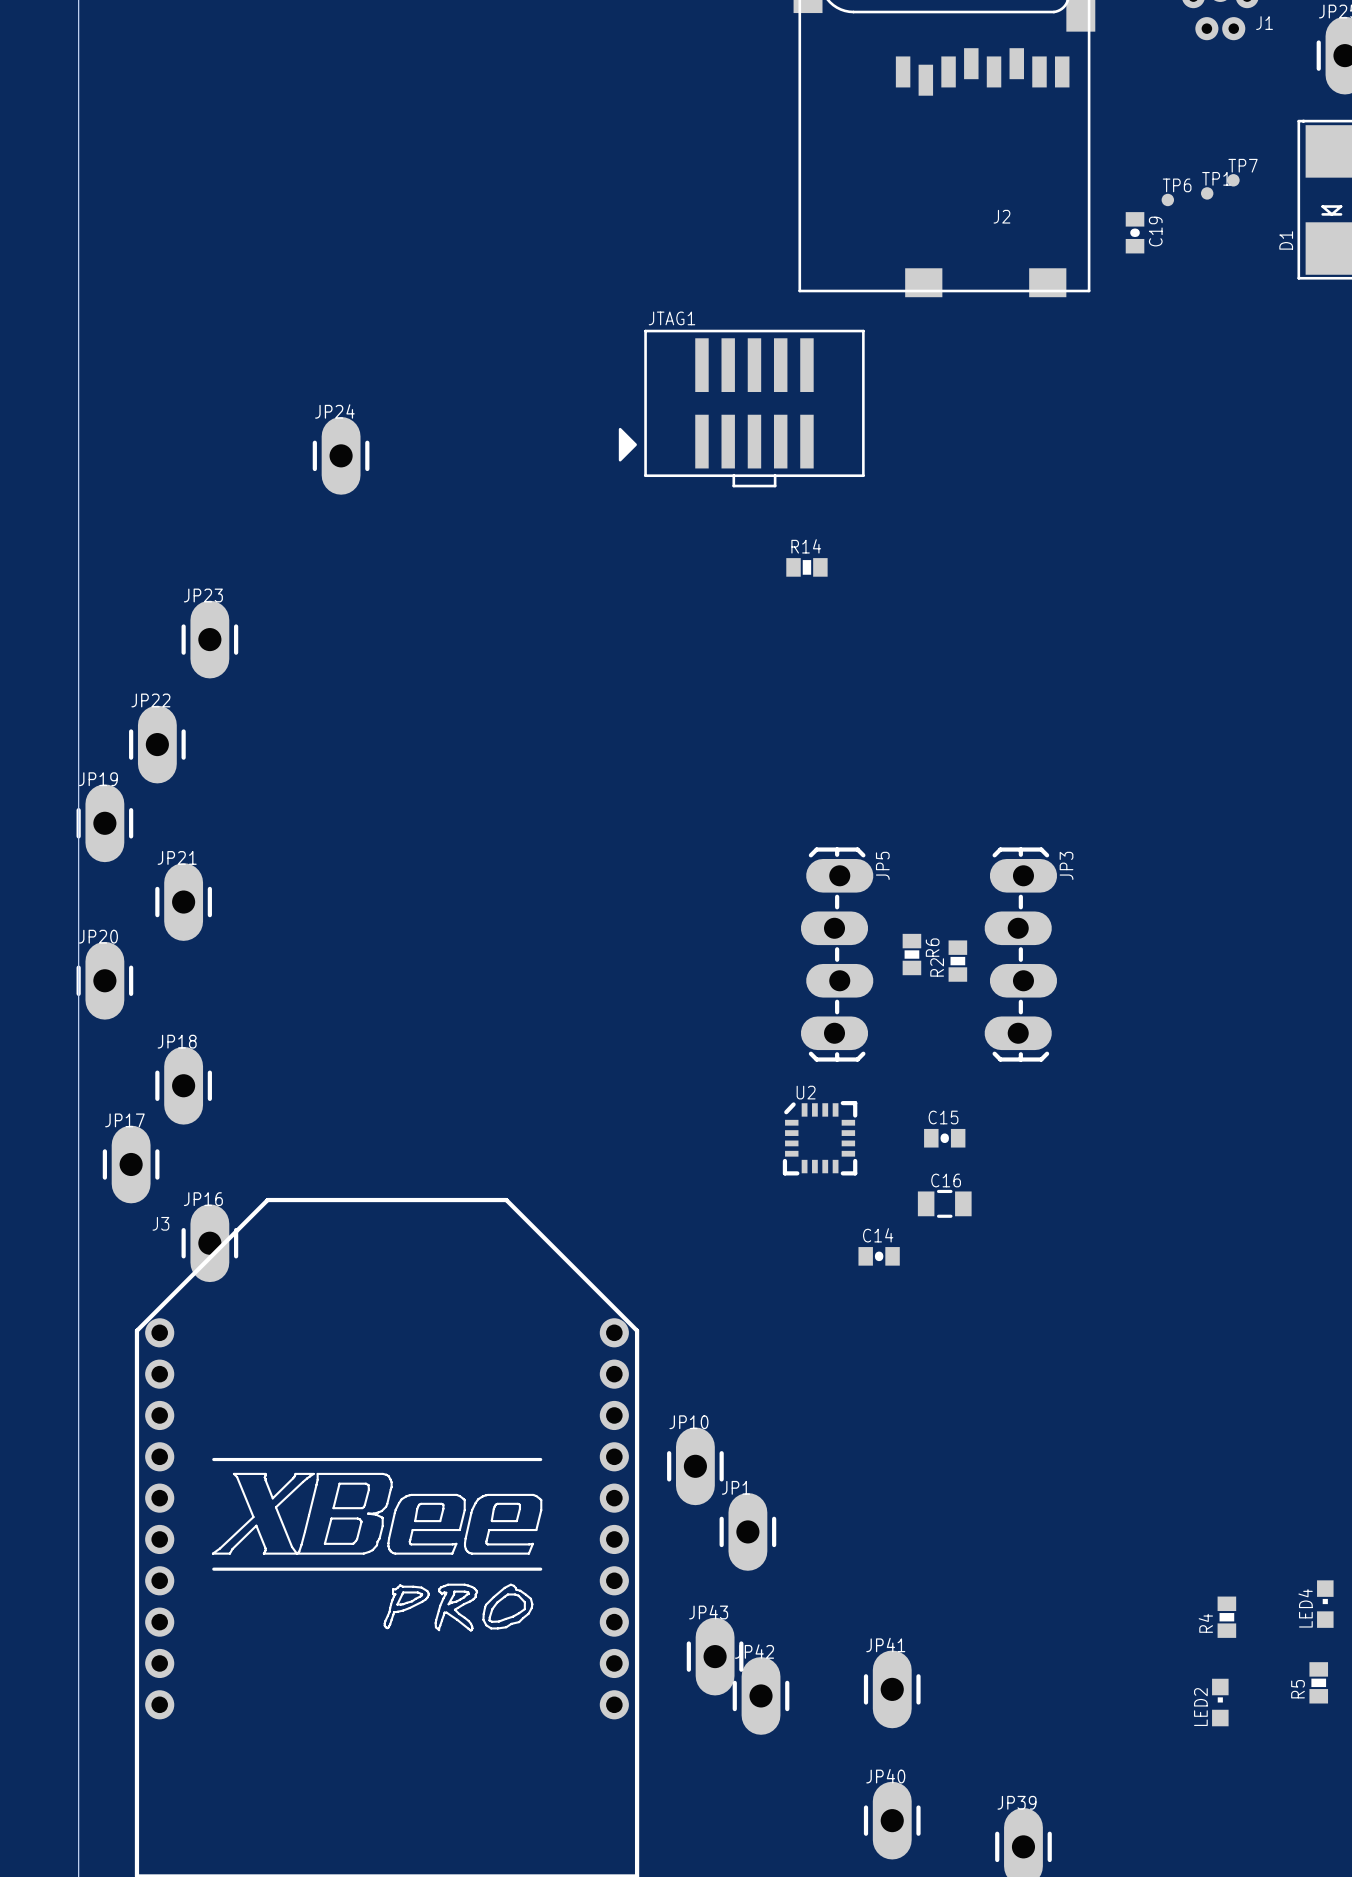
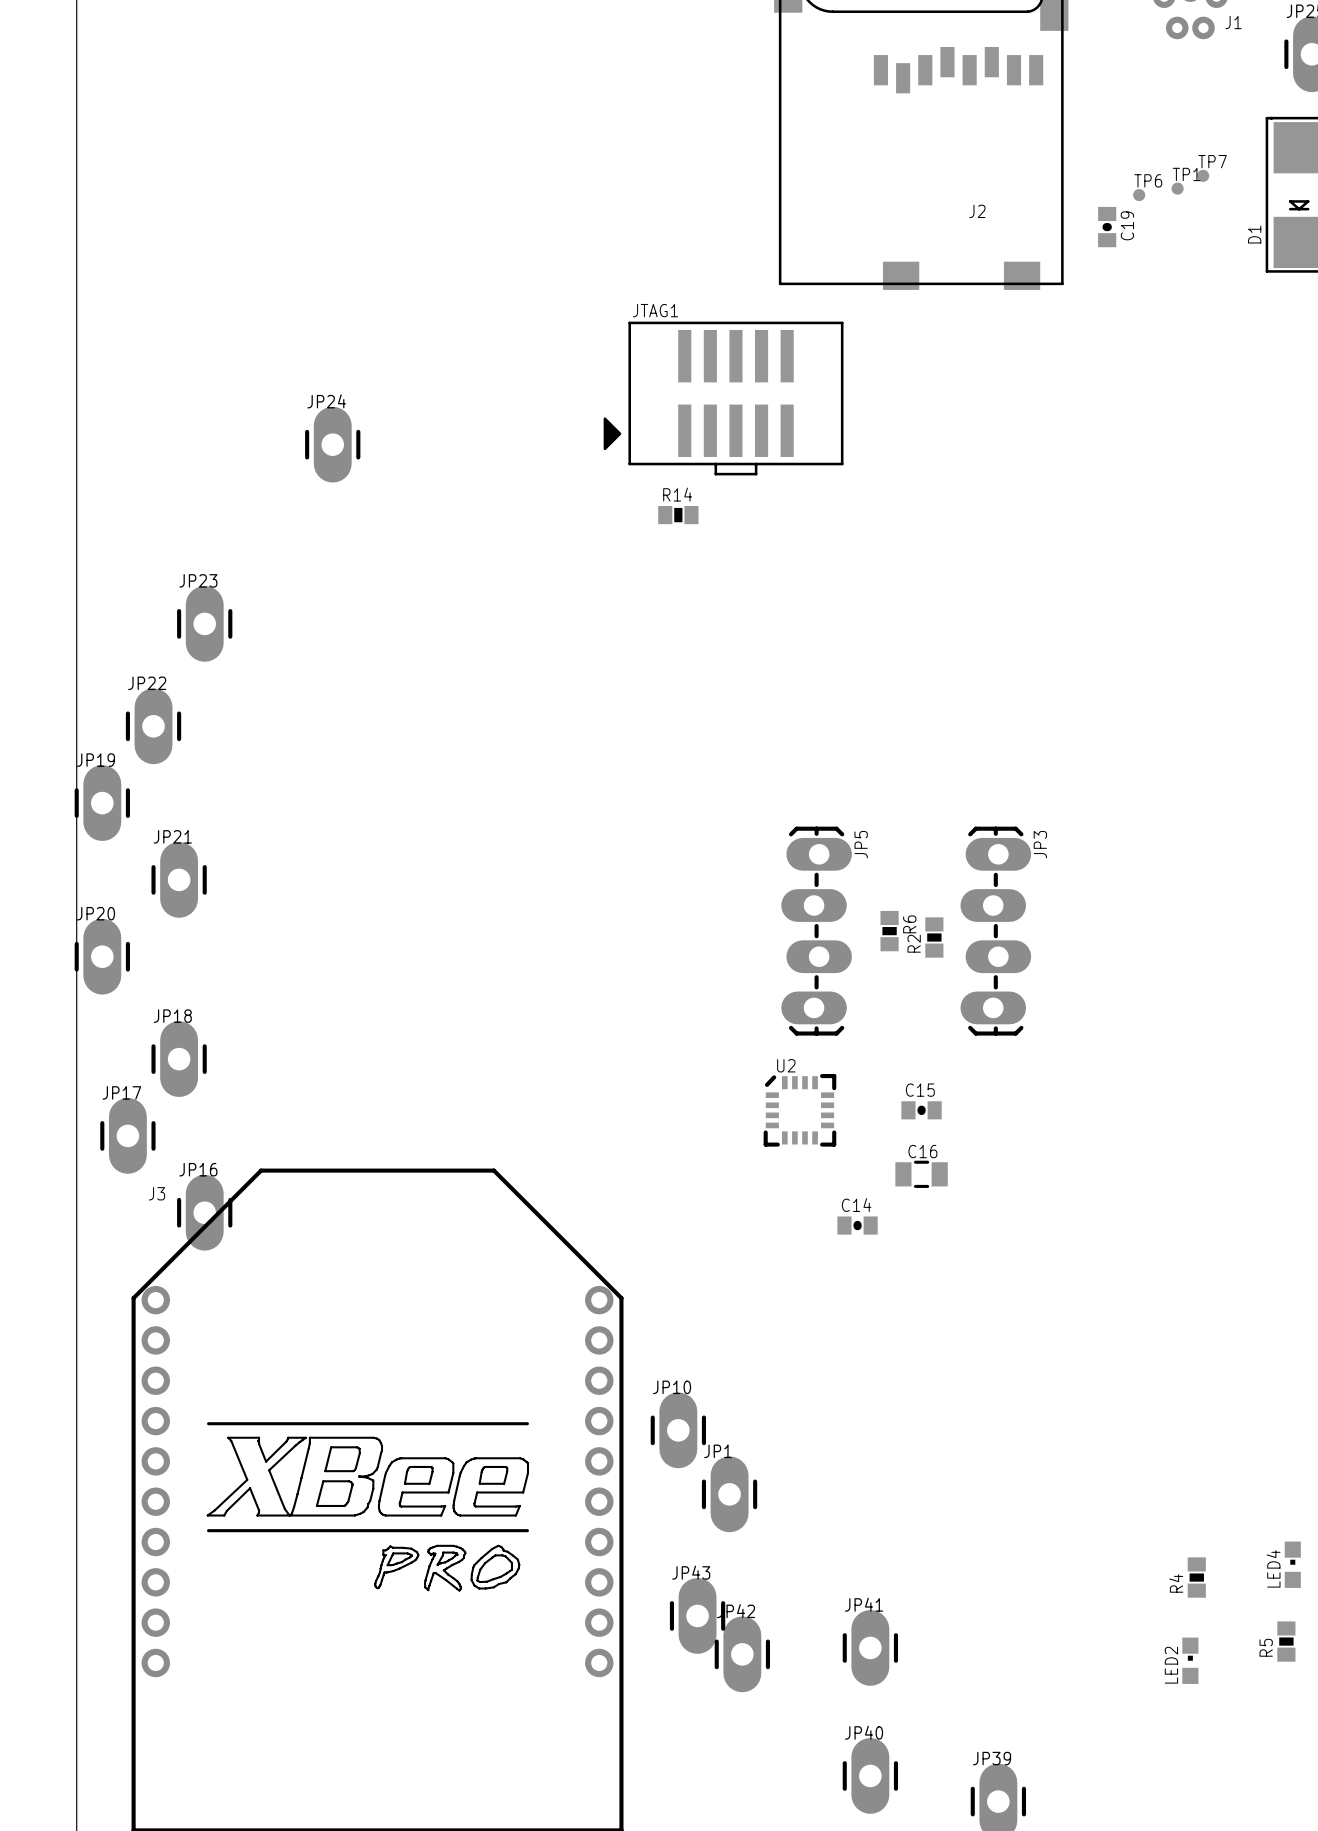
R14 position: (806, 567) -> (678, 515)

